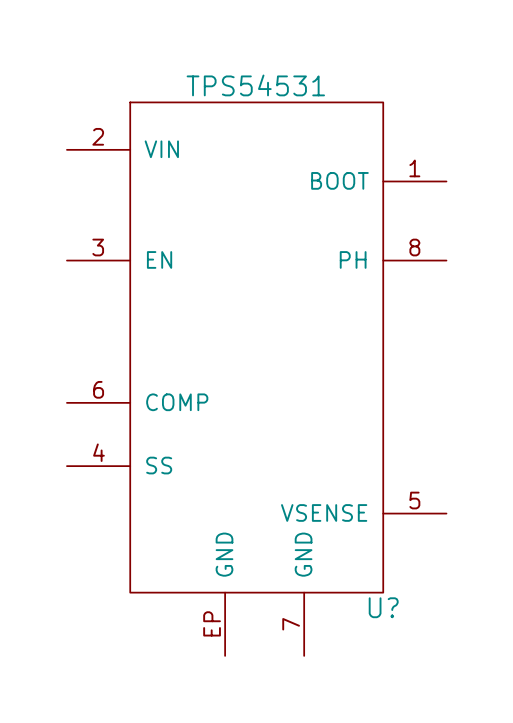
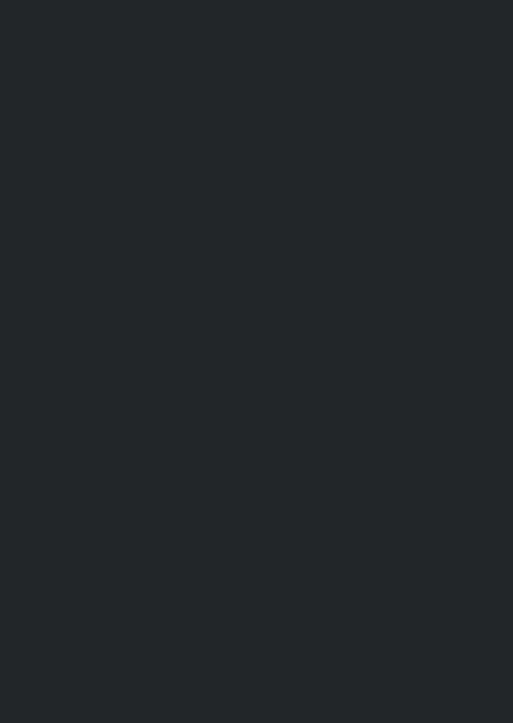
U?: TPS54531 (256, 379) -> none

